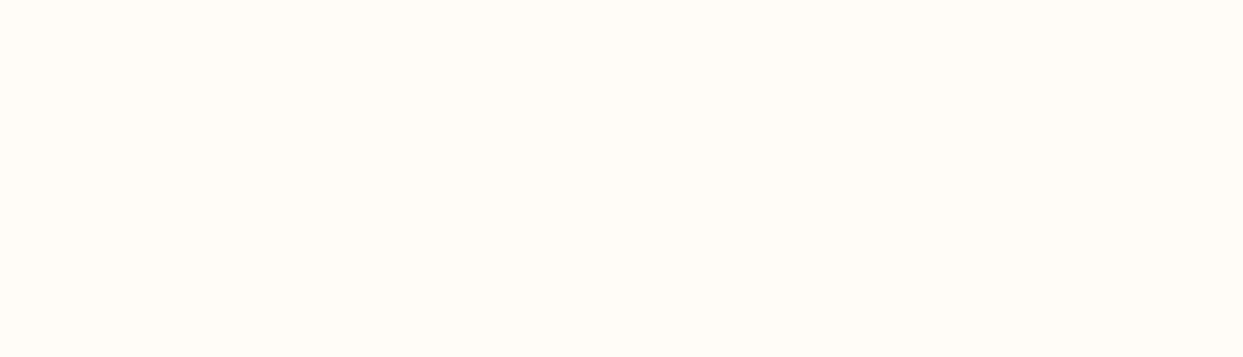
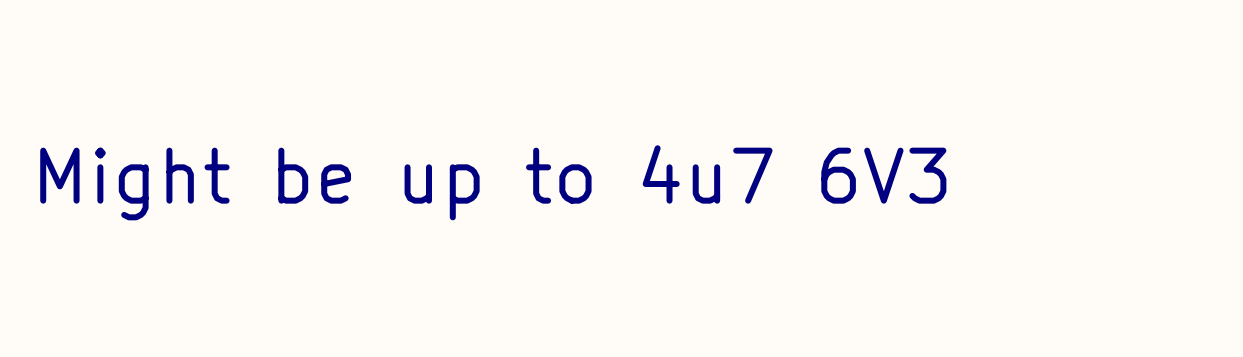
text: none -> Might be up to 4u7 6V3 (493, 182)

